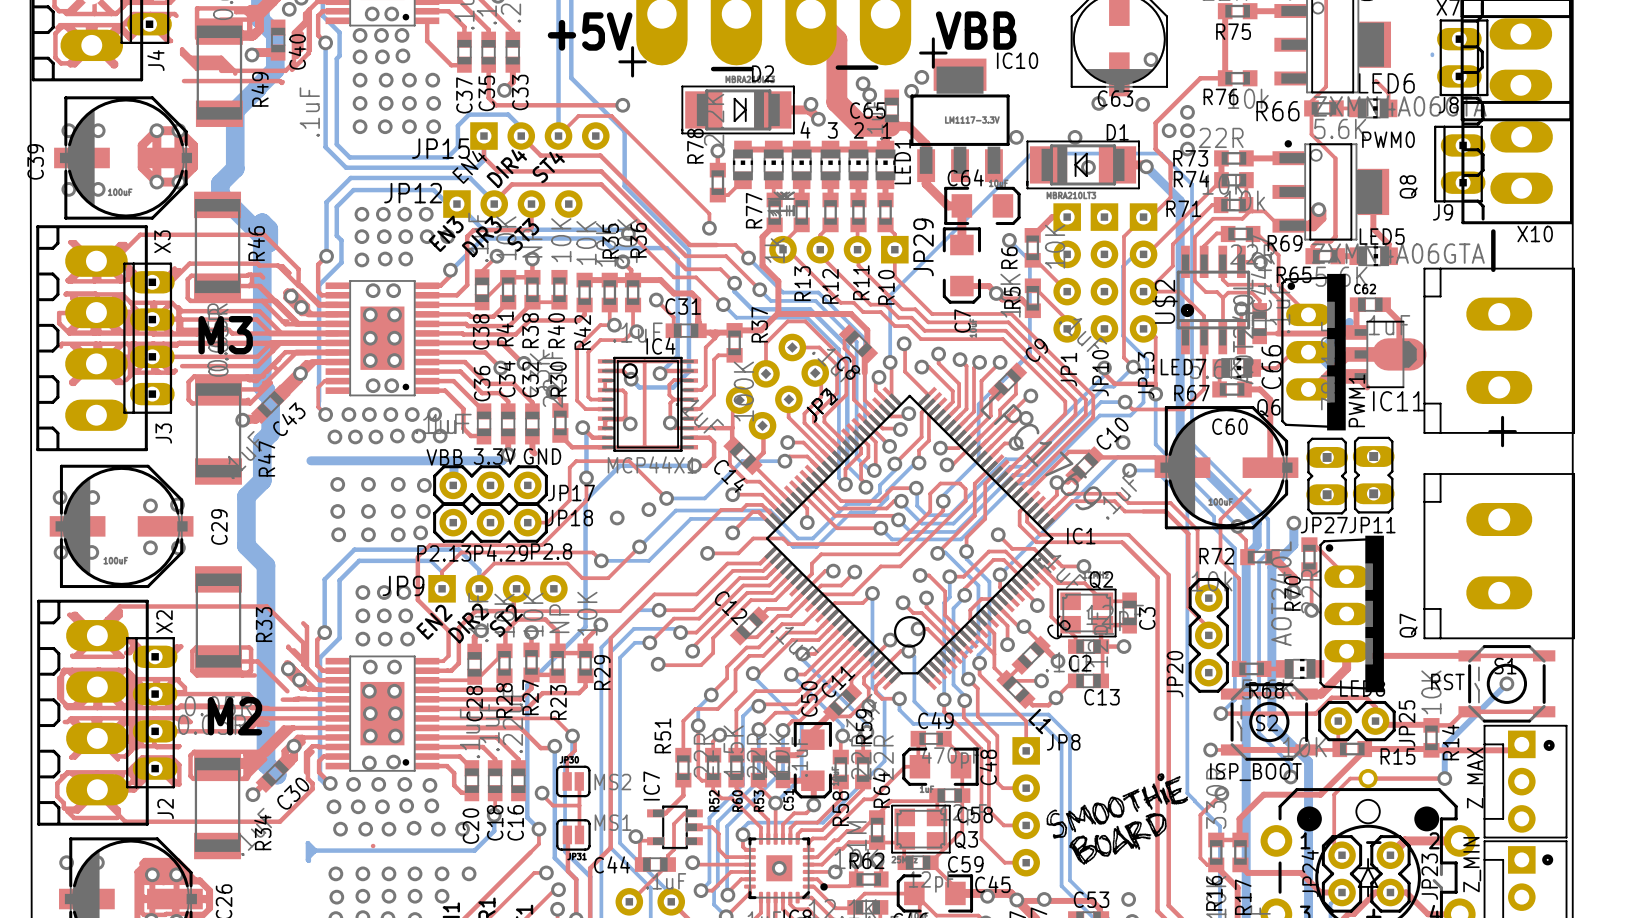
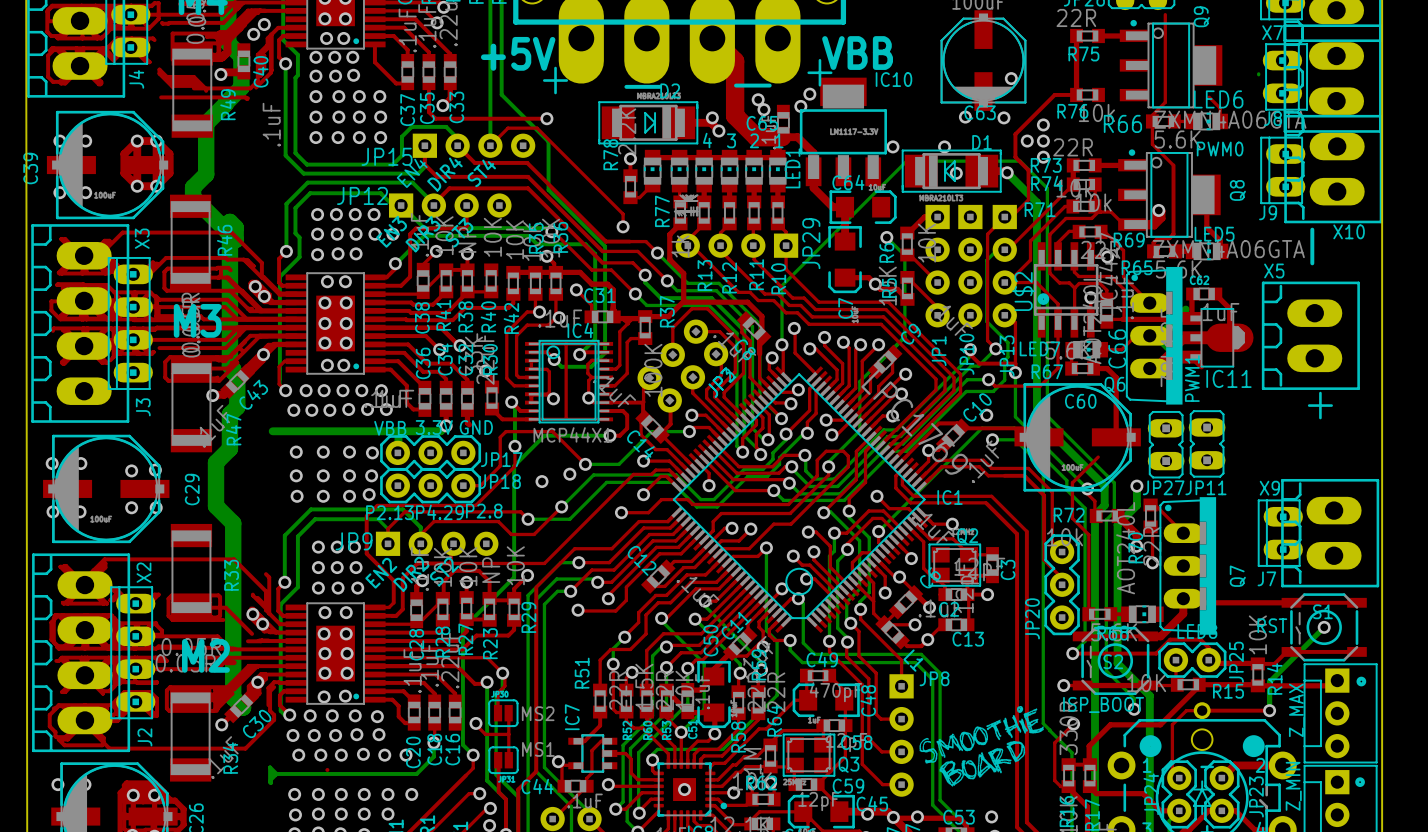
part: (1499, 350) -> none
X5: none -> (1310, 335)
part: (1499, 556) -> none
J7: none -> (1280, 533)
X9: none -> (1330, 533)

